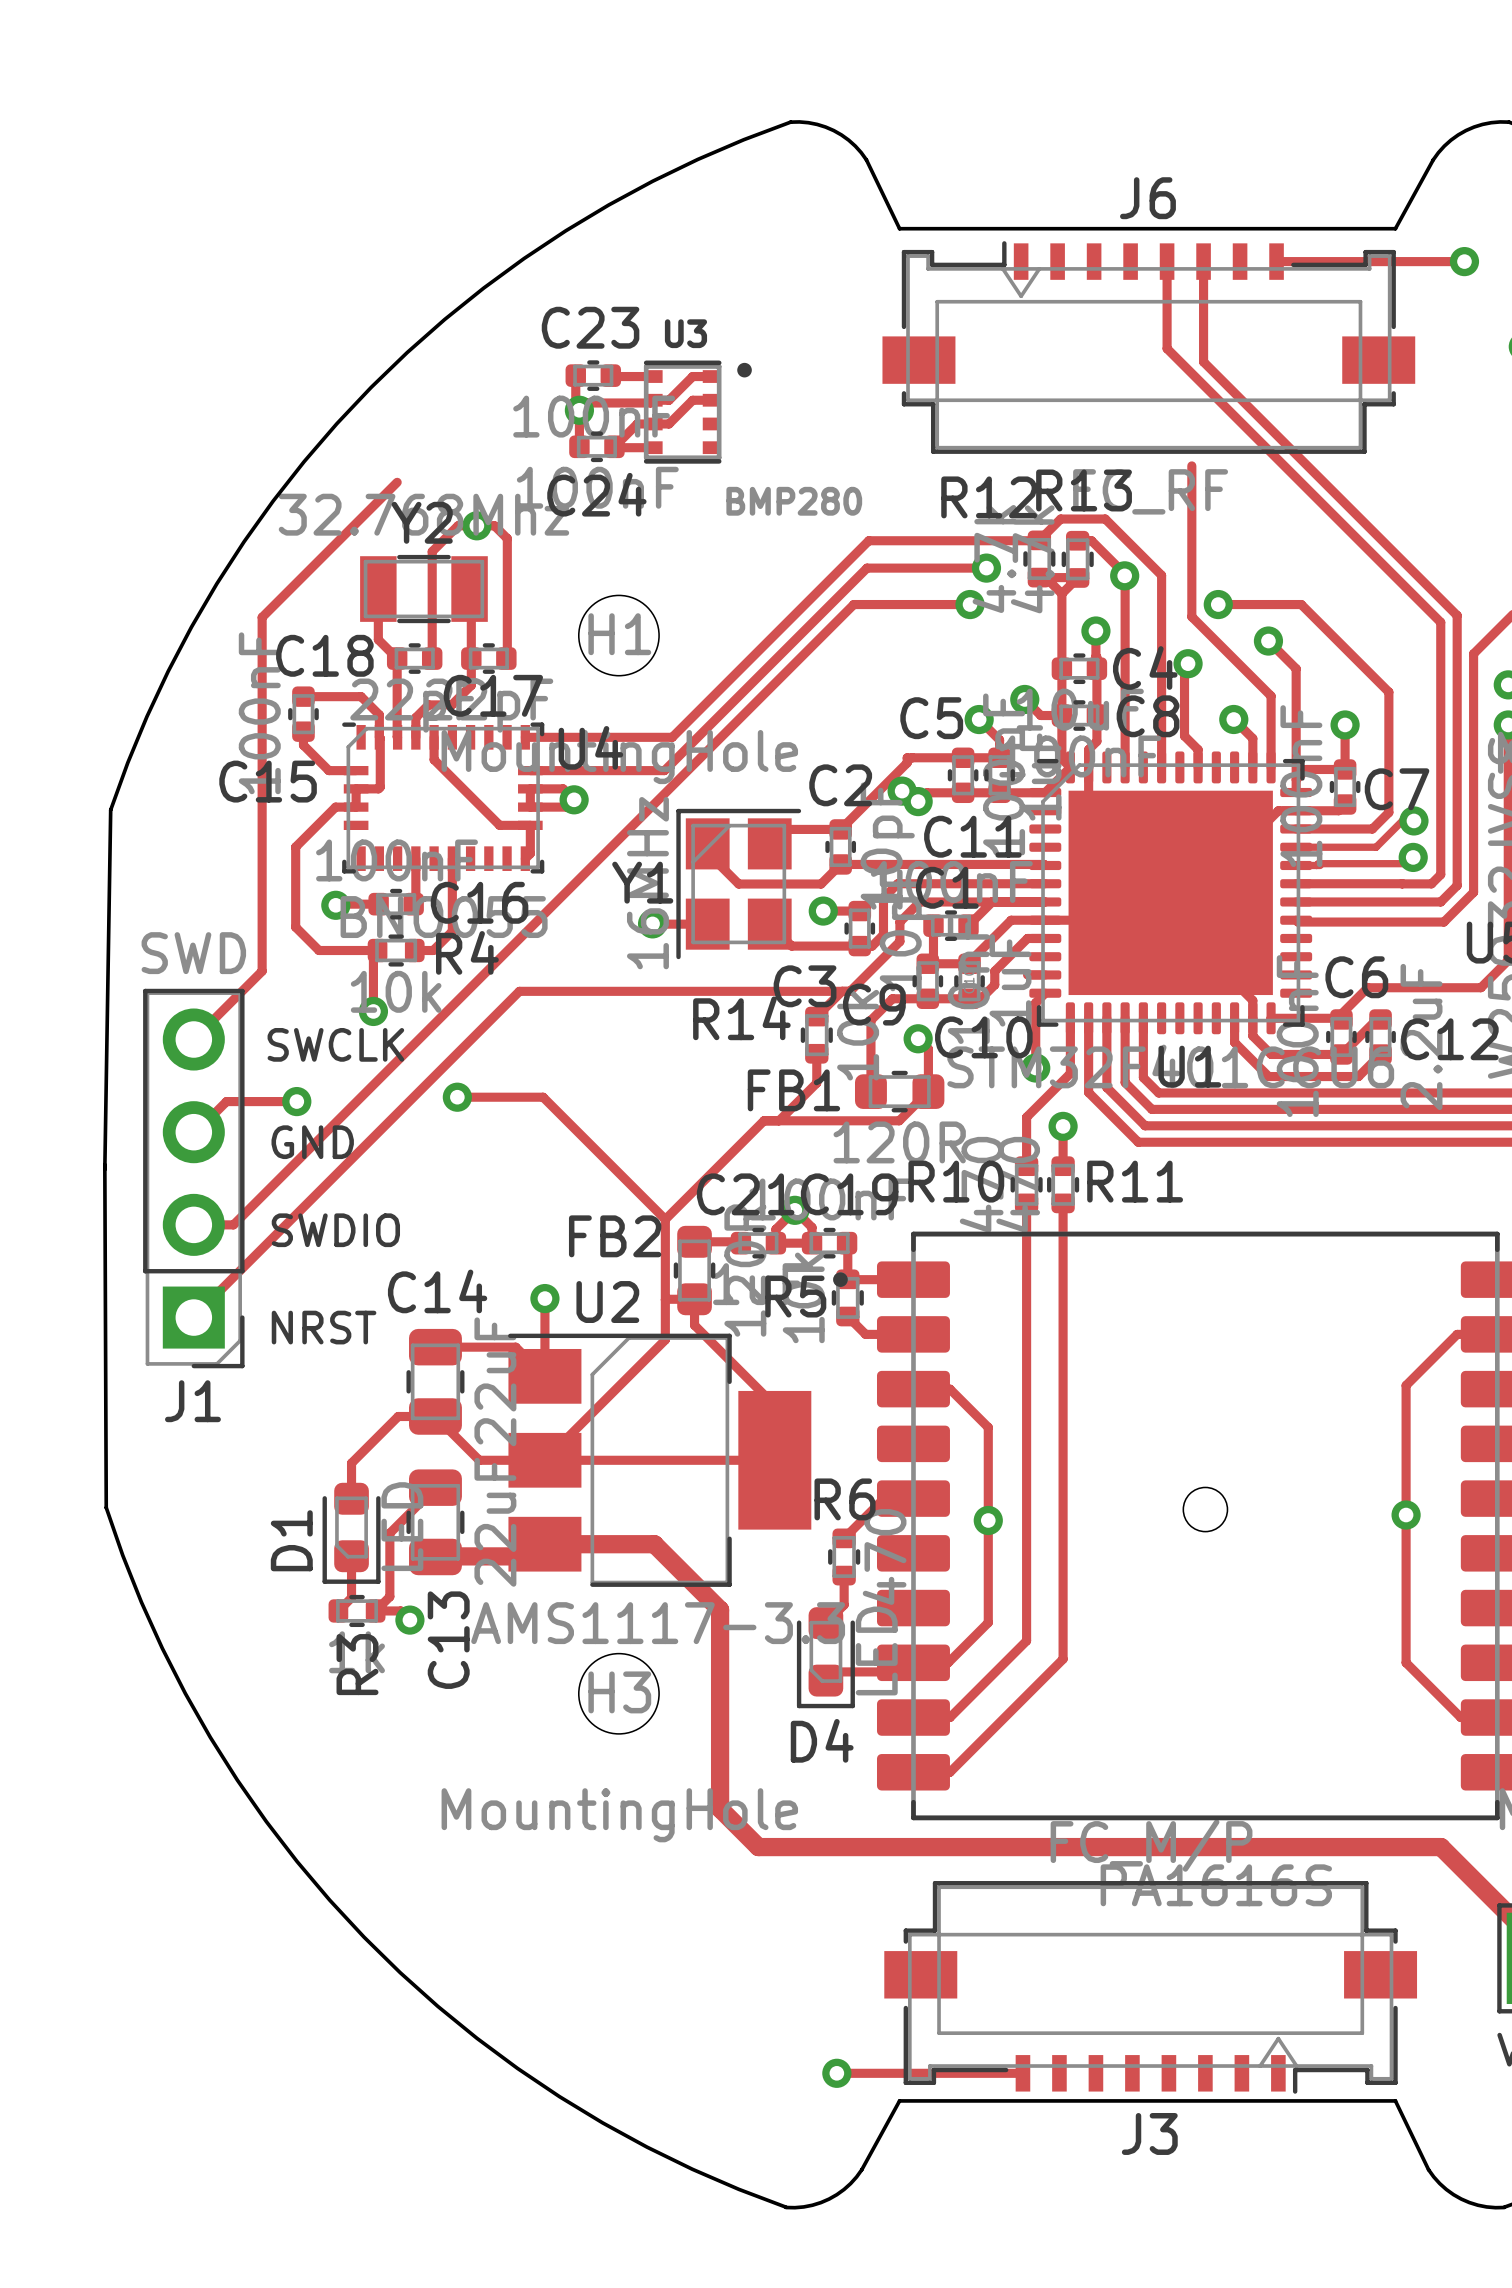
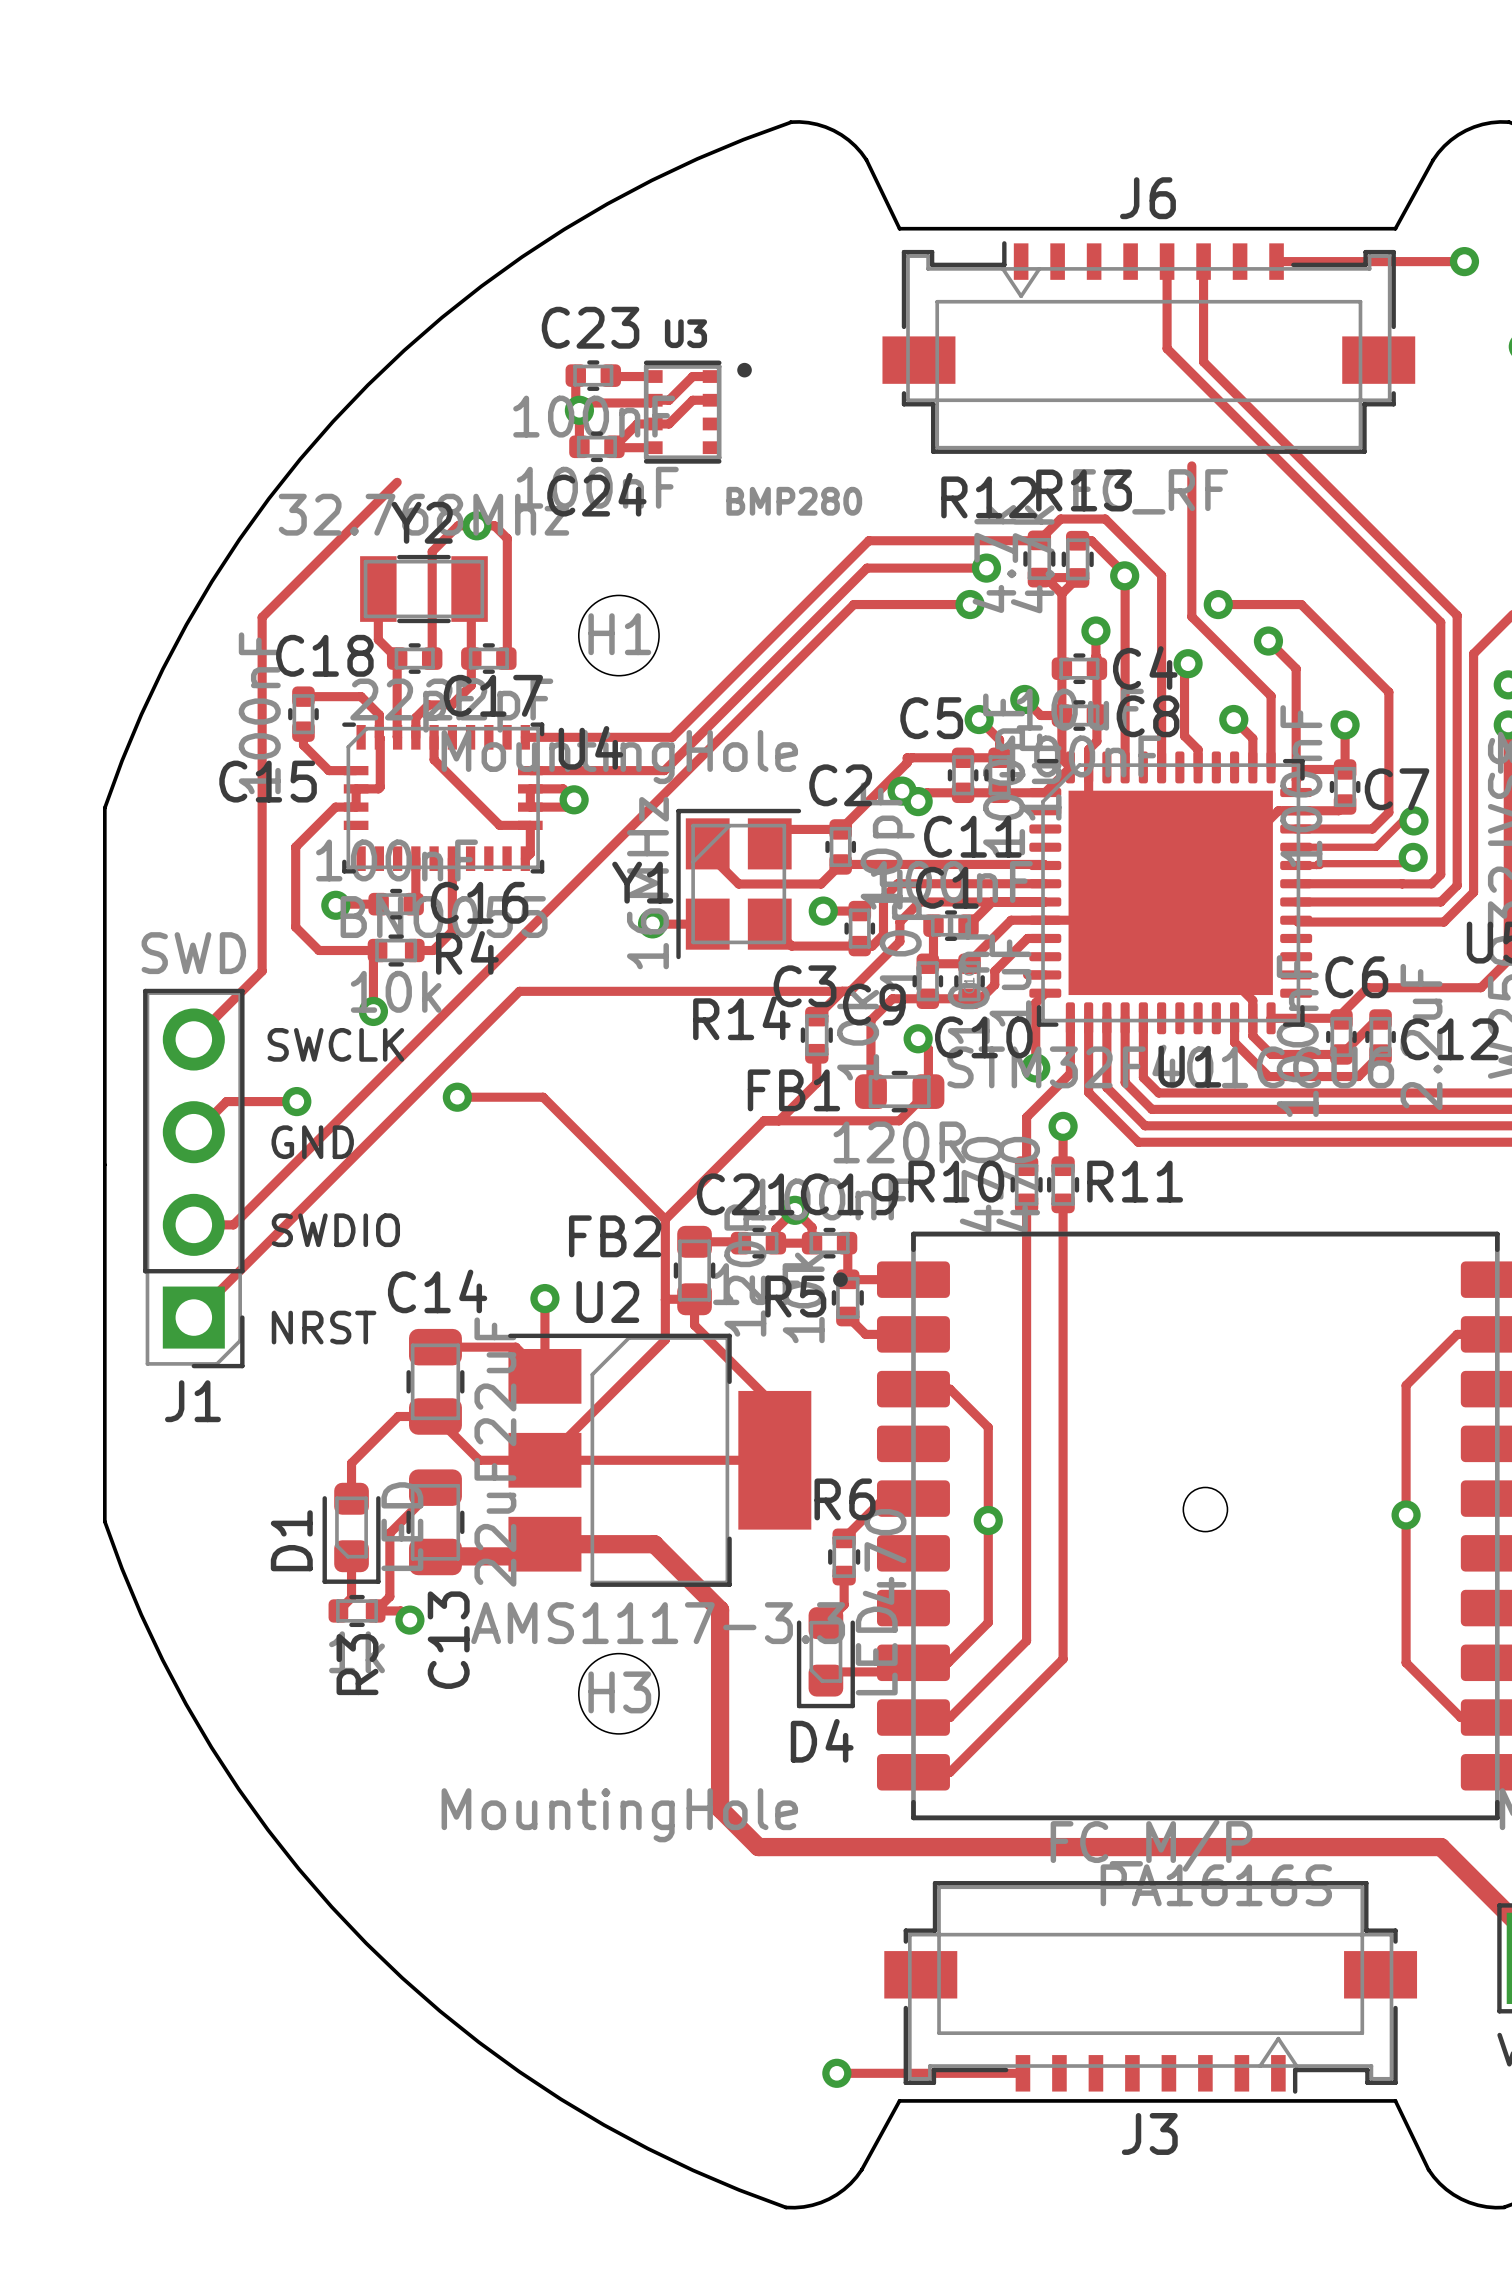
board edge: (790, 122) (743, 139) (652, 181) (565, 230) (483, 288) (407, 352) (371, 387) (304, 461) (244, 541) (191, 627) (168, 671) (127, 762) (110, 809) (104, 1169) -> (790, 122) (697, 158) (651, 180) (564, 229) (481, 286) (442, 317) (367, 385) (300, 459) (268, 498) (211, 581) (162, 669) (141, 714) (104, 807) (104, 1521) (141, 1614) (162, 1660) (186, 1704) (238, 1789) (298, 1869) (366, 1943) (439, 2010) (519, 2071) (603, 2125) (693, 2170) (786, 2207)
board edge: (104, 1164) (106, 1507) (122, 1555) (162, 1648) (210, 1737) (237, 1780) (266, 1821) (329, 1900) (400, 1972) (476, 2038) (517, 2068) (602, 2122) (692, 2169) (786, 2207) -> none

